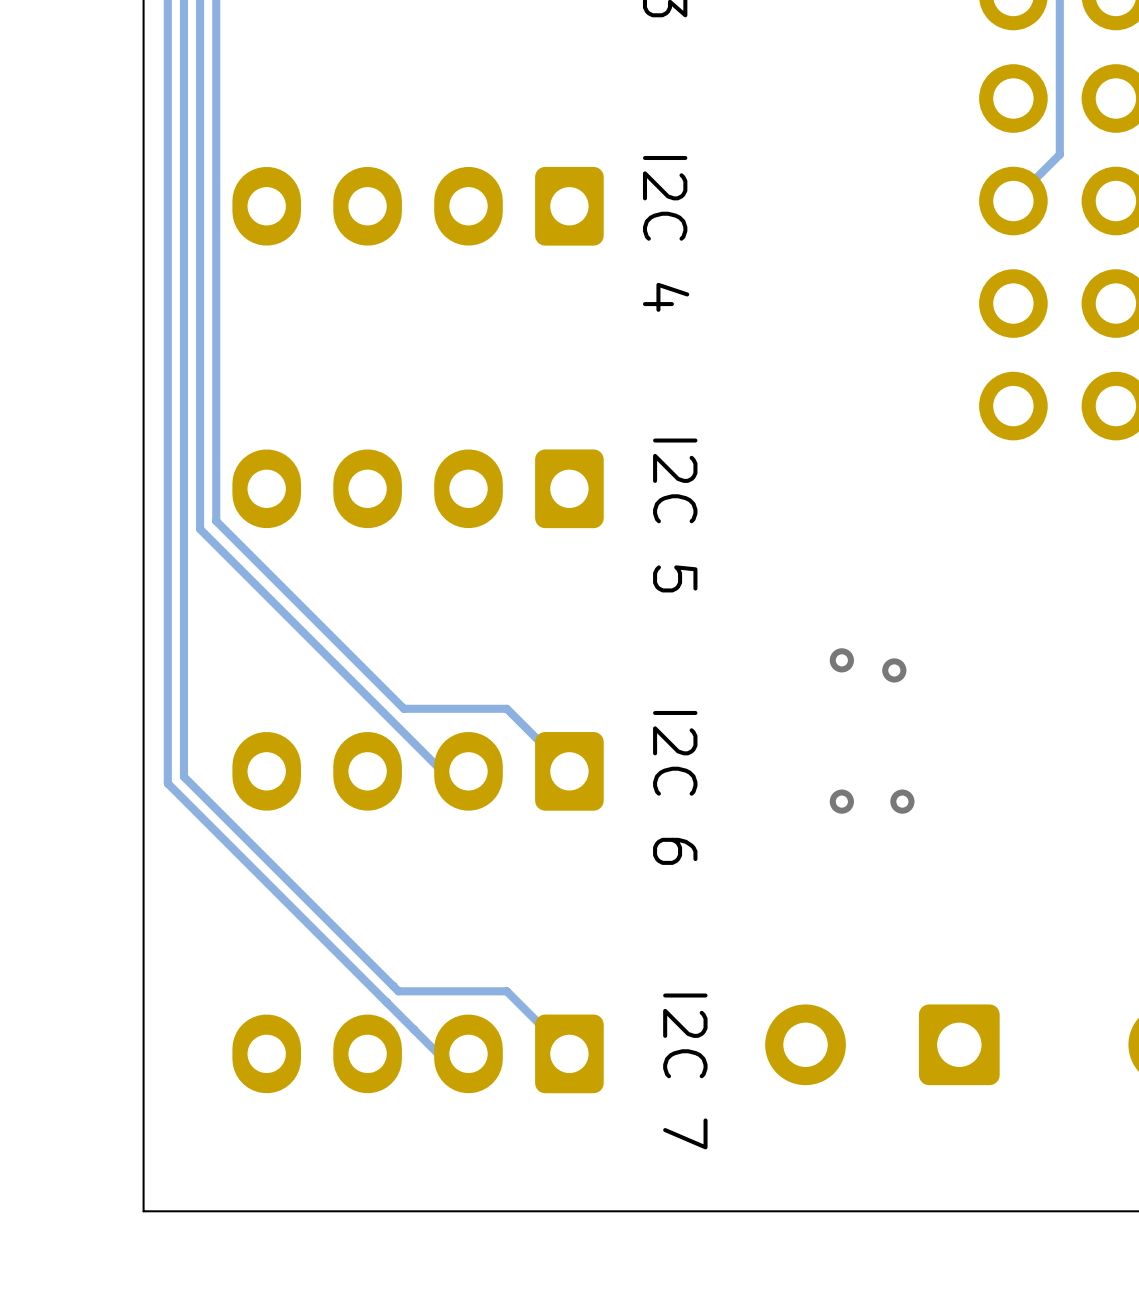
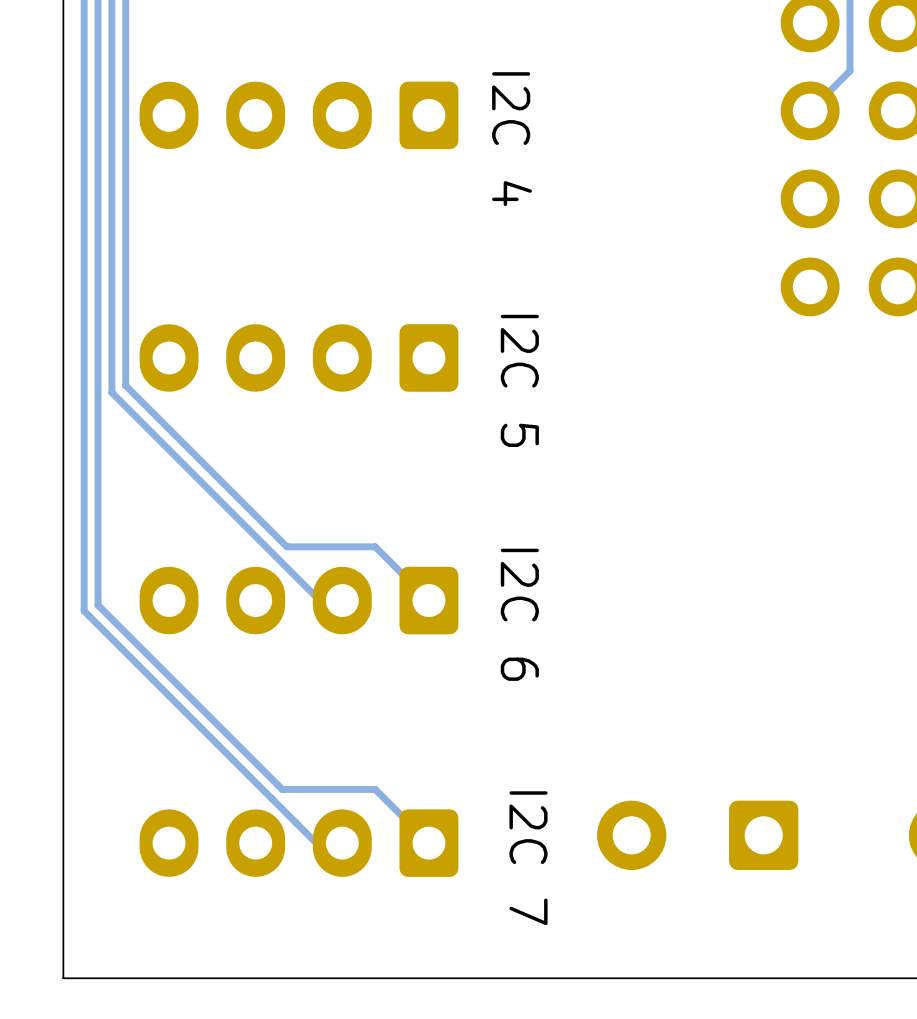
via: (841, 660) -> none
via: (894, 670) -> none
via: (841, 801) -> none
via: (902, 801) -> none

